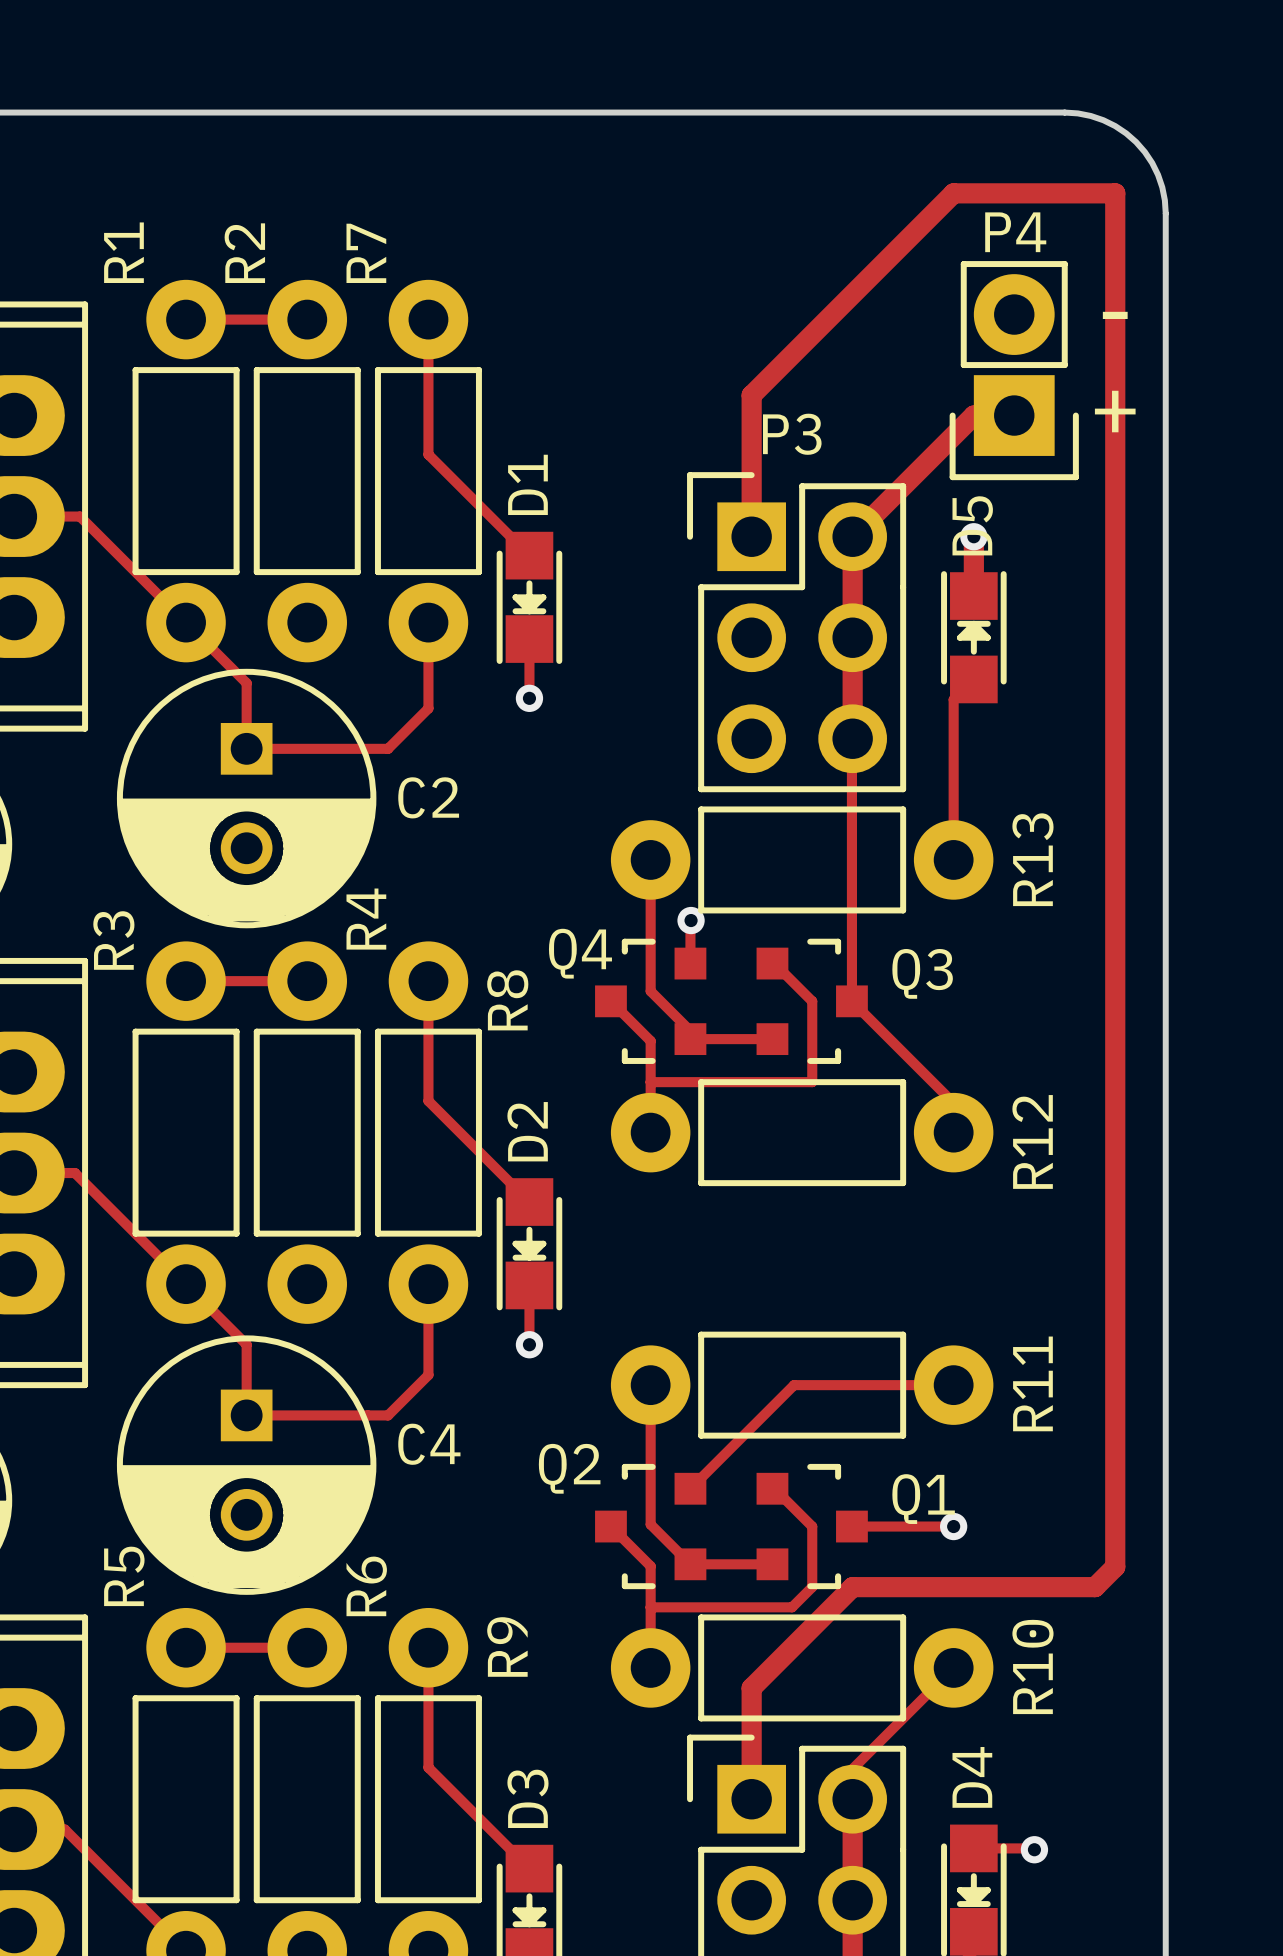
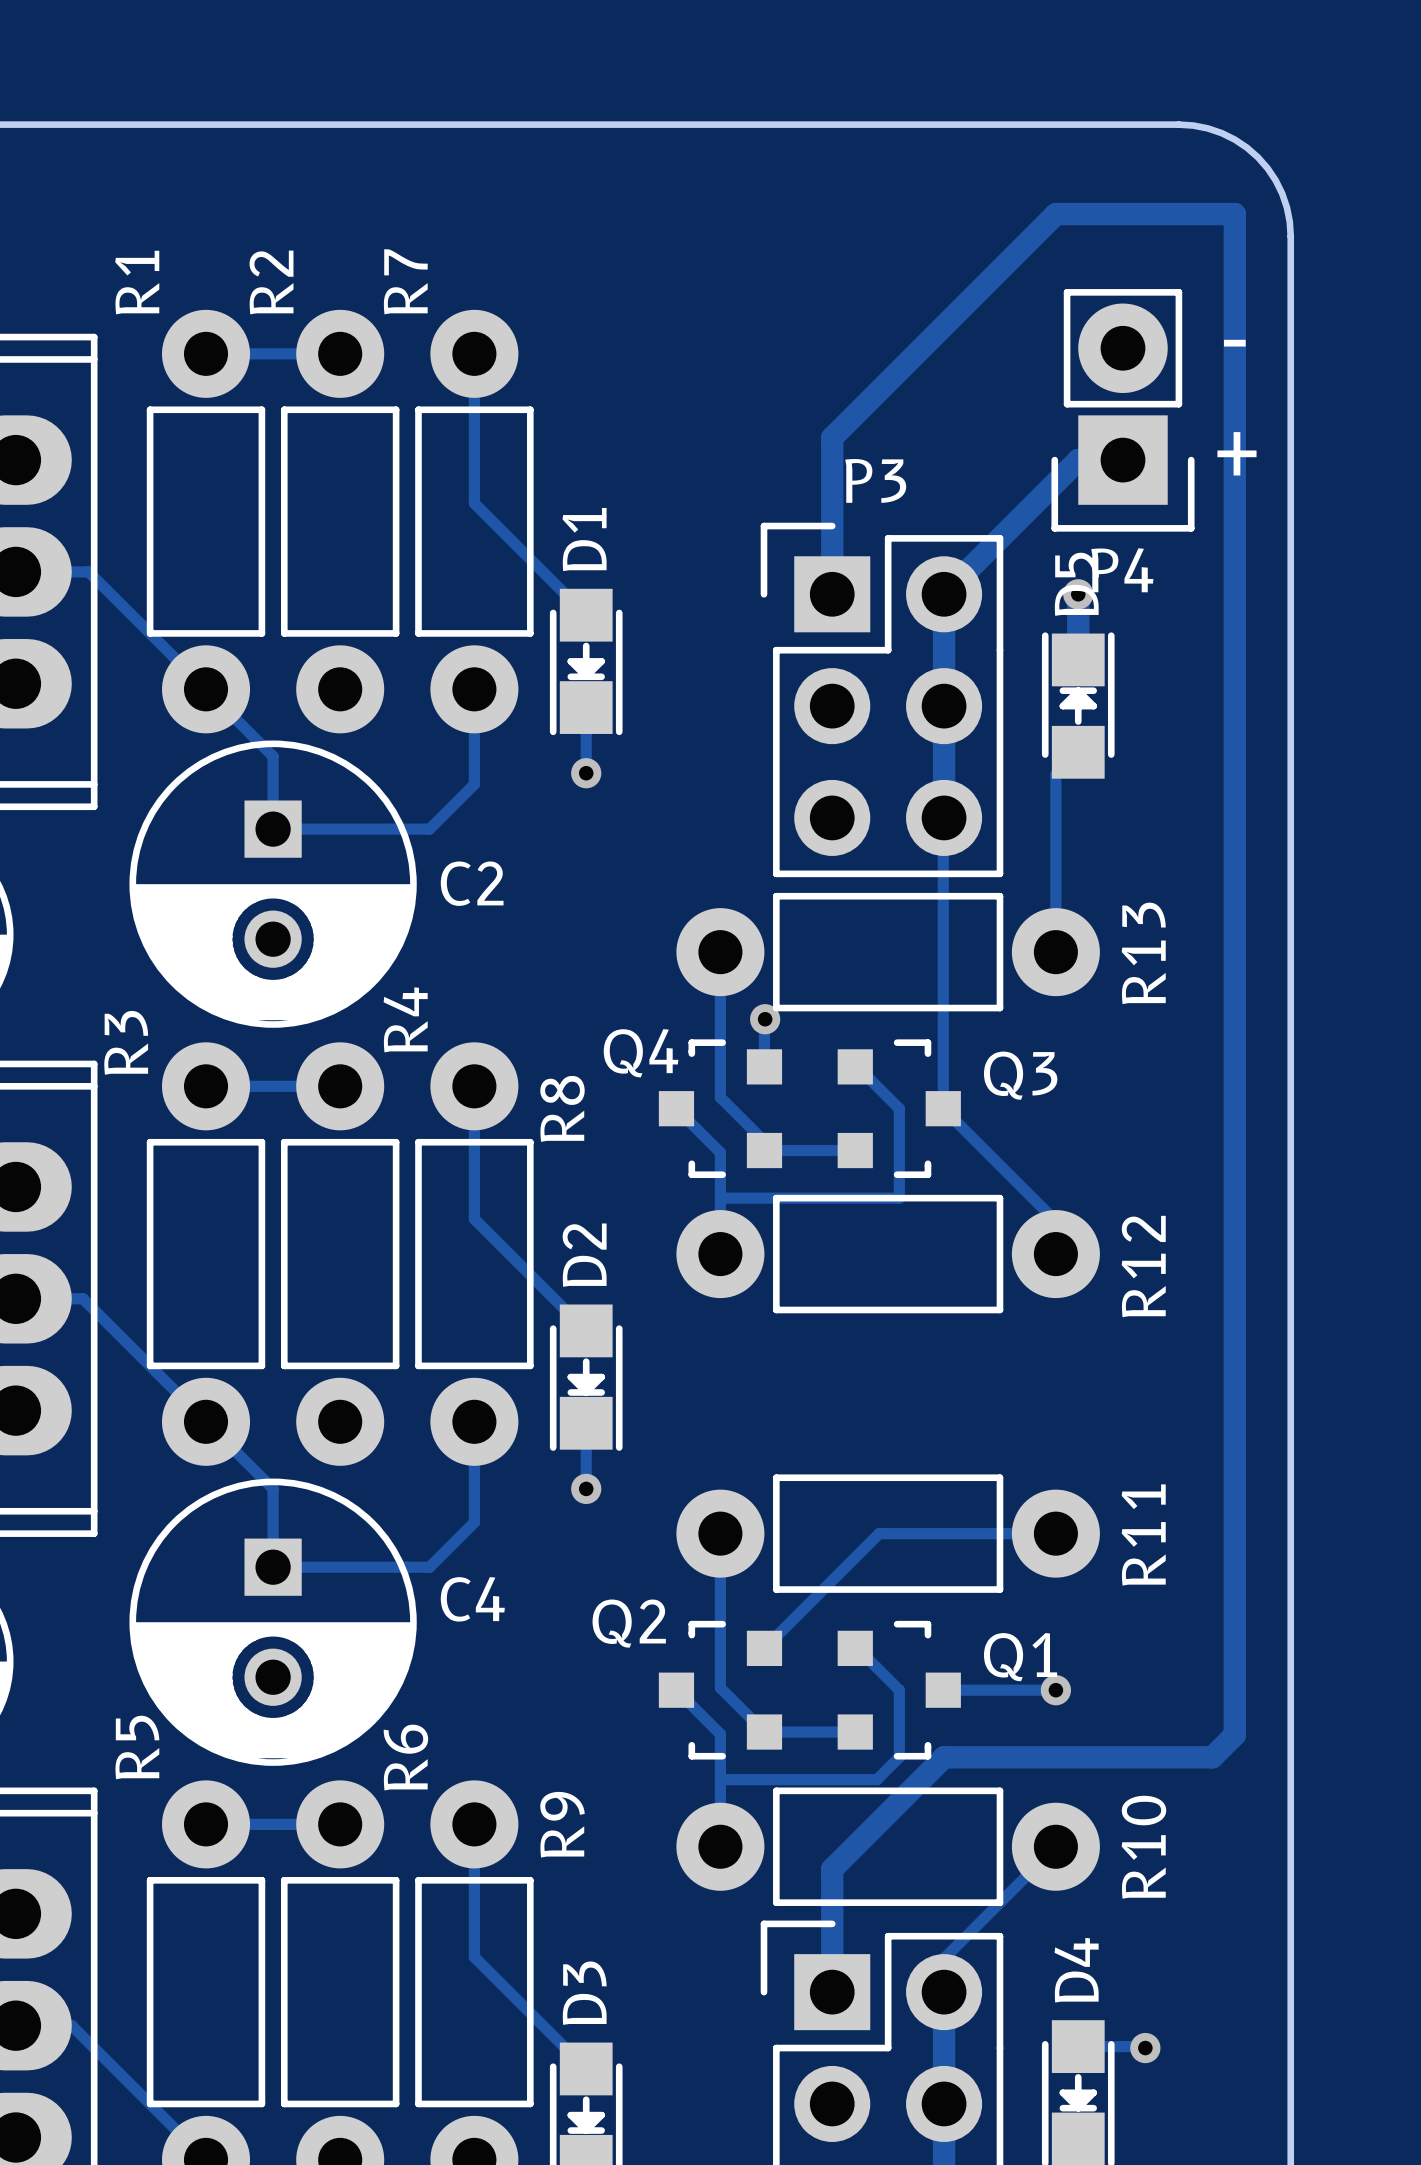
P4 name position: P4 (1015, 232) -> P4 (1122, 570)

